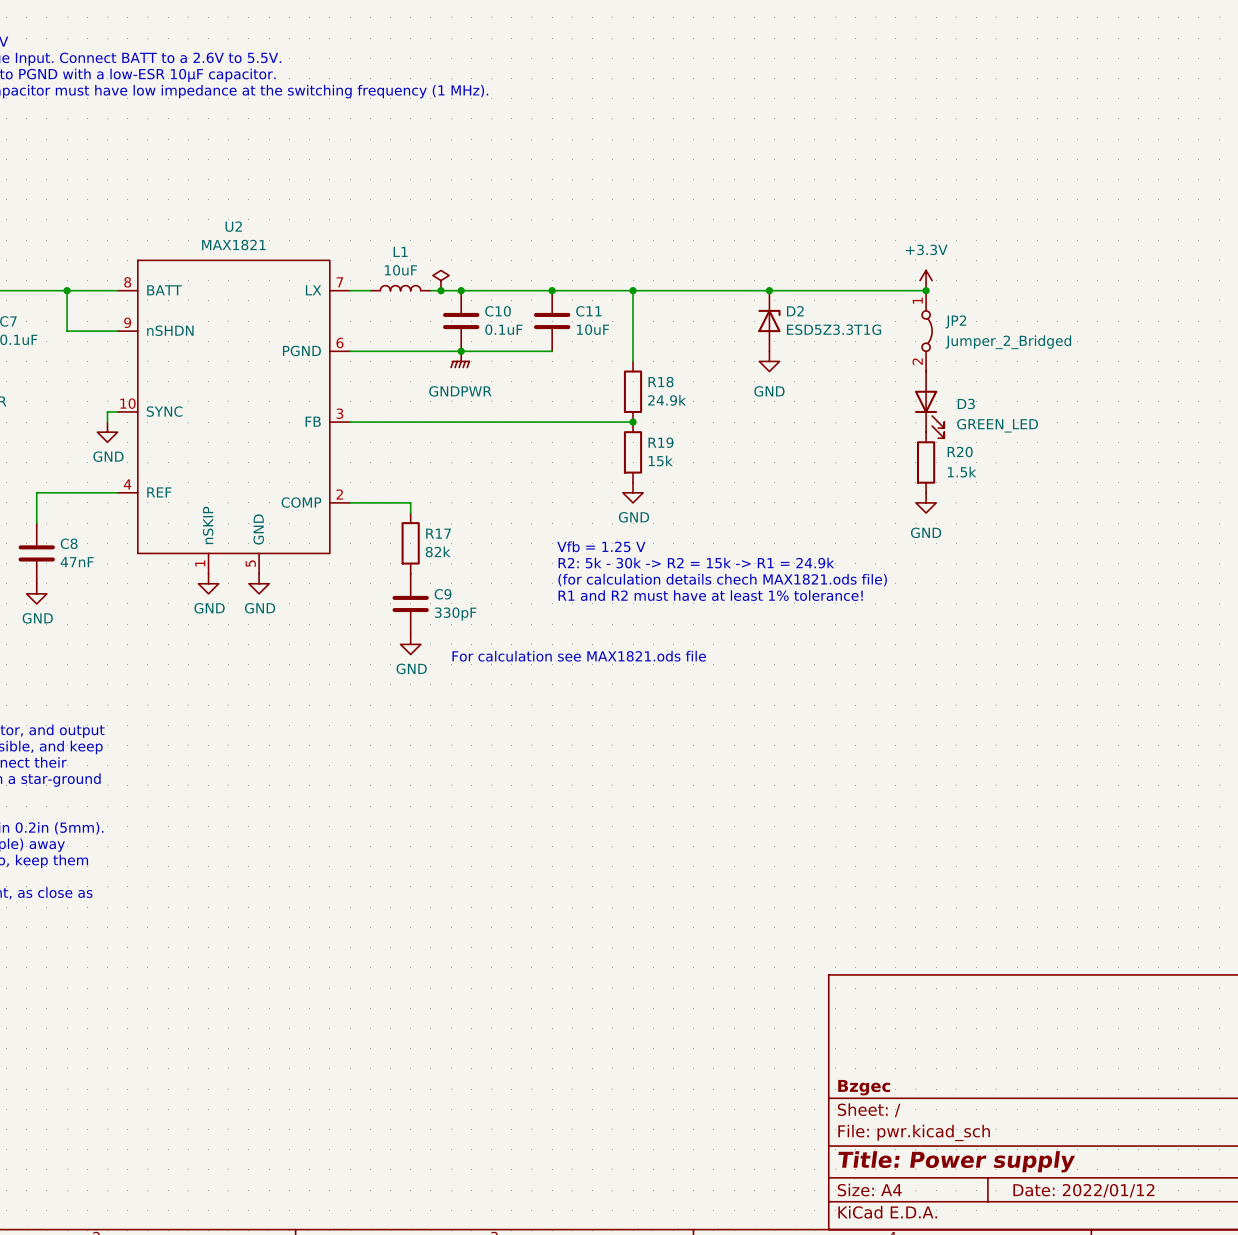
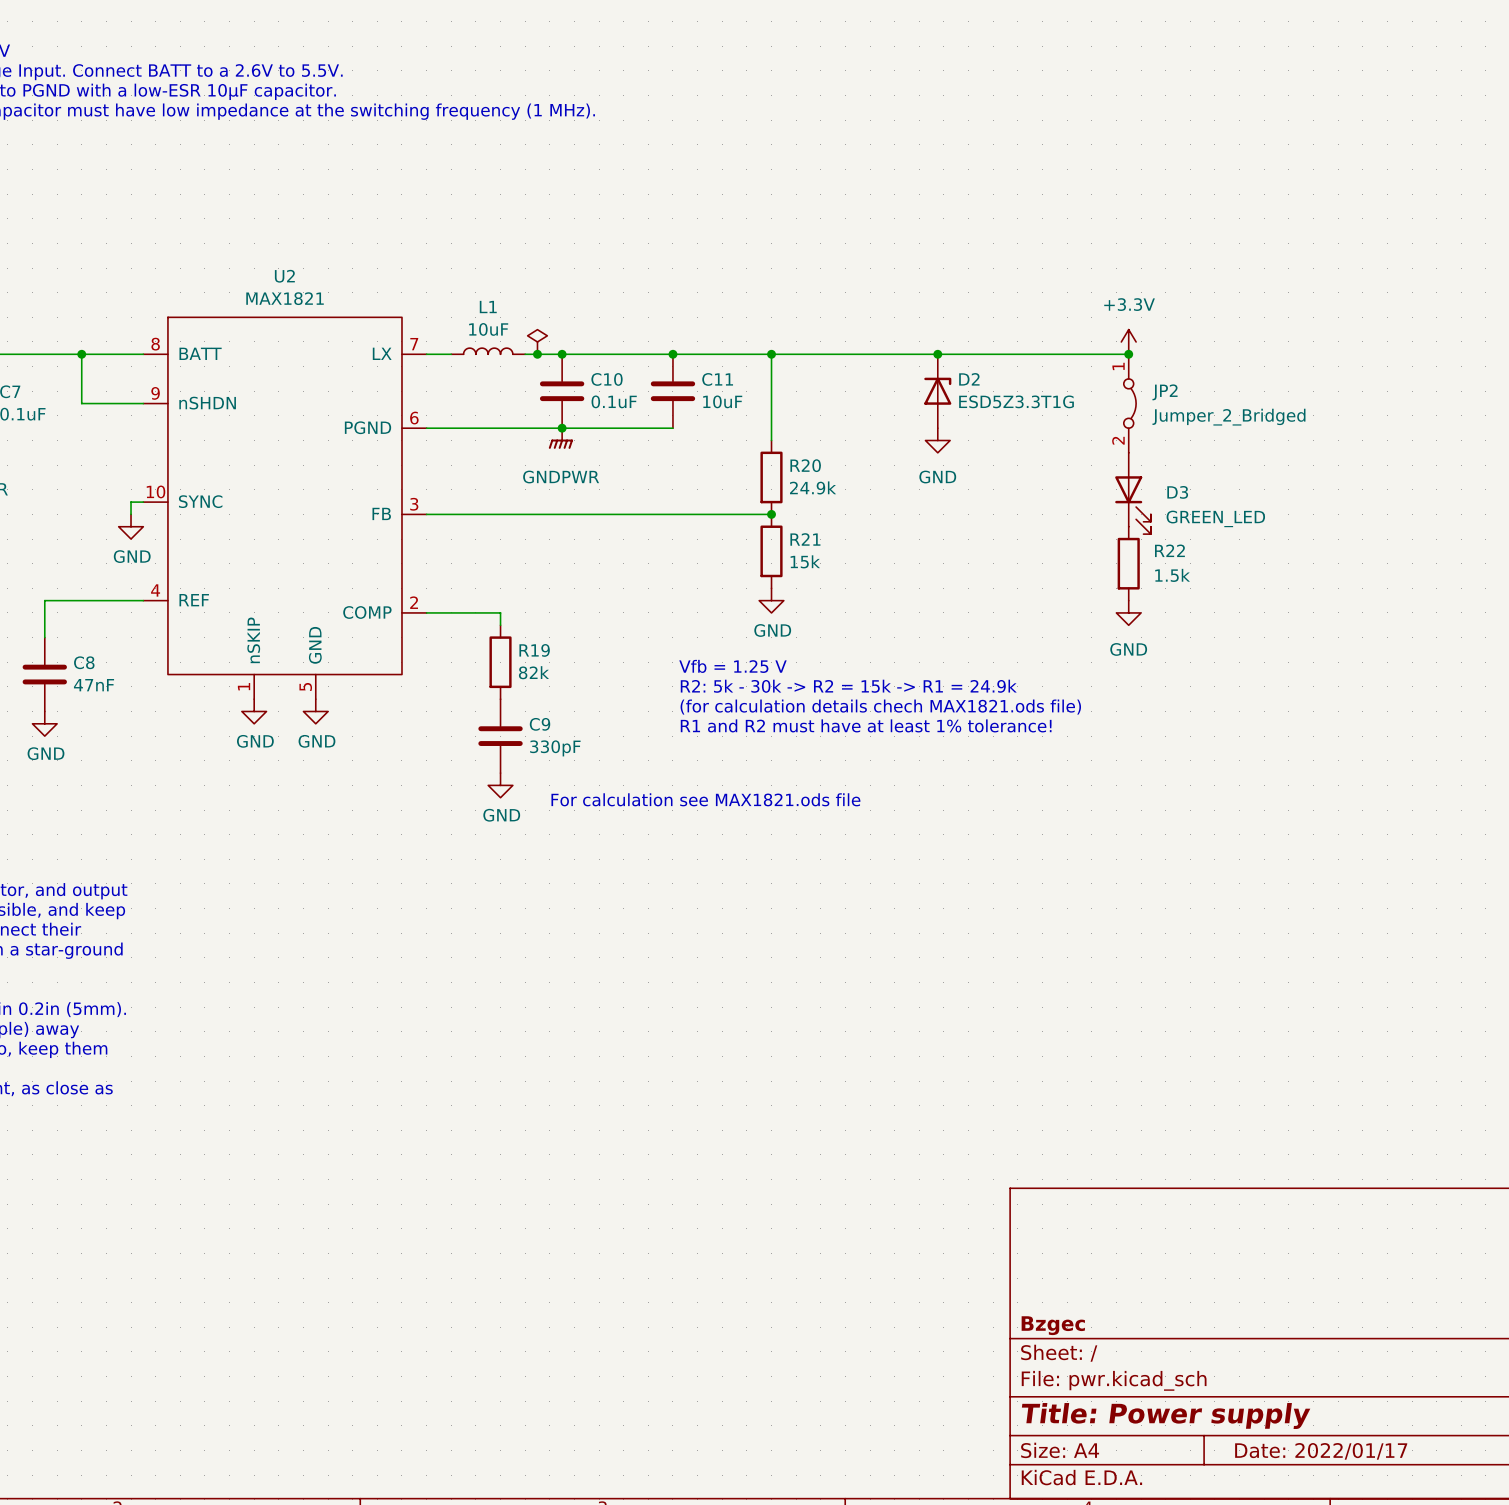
R18 name: R18 (660, 382) -> R20 (805, 465)
R19 name: R19 (660, 442) -> R21 (805, 539)
R20 name: R20 (960, 452) -> R22 (1169, 550)
R17 name: R17 (438, 533) -> R19 (534, 650)
title block: Date: 2022/01/12 (1083, 1190) -> Date: 2022/01/17 (1321, 1451)

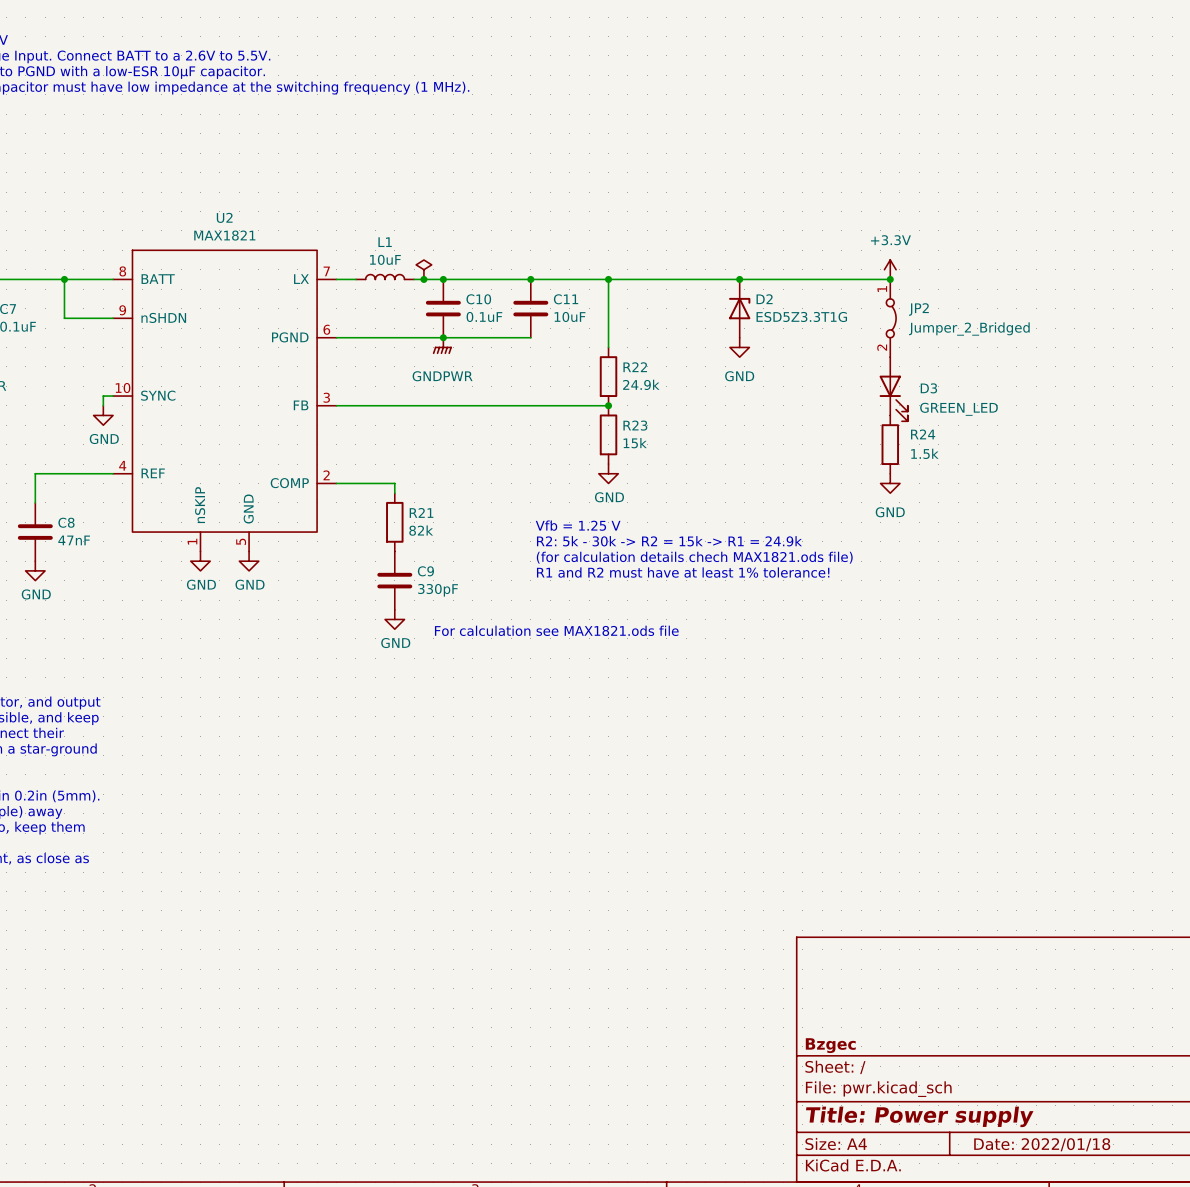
R20 name: R20 (805, 465) -> R22 (635, 367)
R21 name: R21 (805, 539) -> R23 (635, 425)
R22 name: R22 (1169, 550) -> R24 (923, 434)
R19 name: R19 (534, 650) -> R21 (421, 512)
title block: Date: 2022/01/17 (1321, 1451) -> Date: 2022/01/18 (1042, 1144)

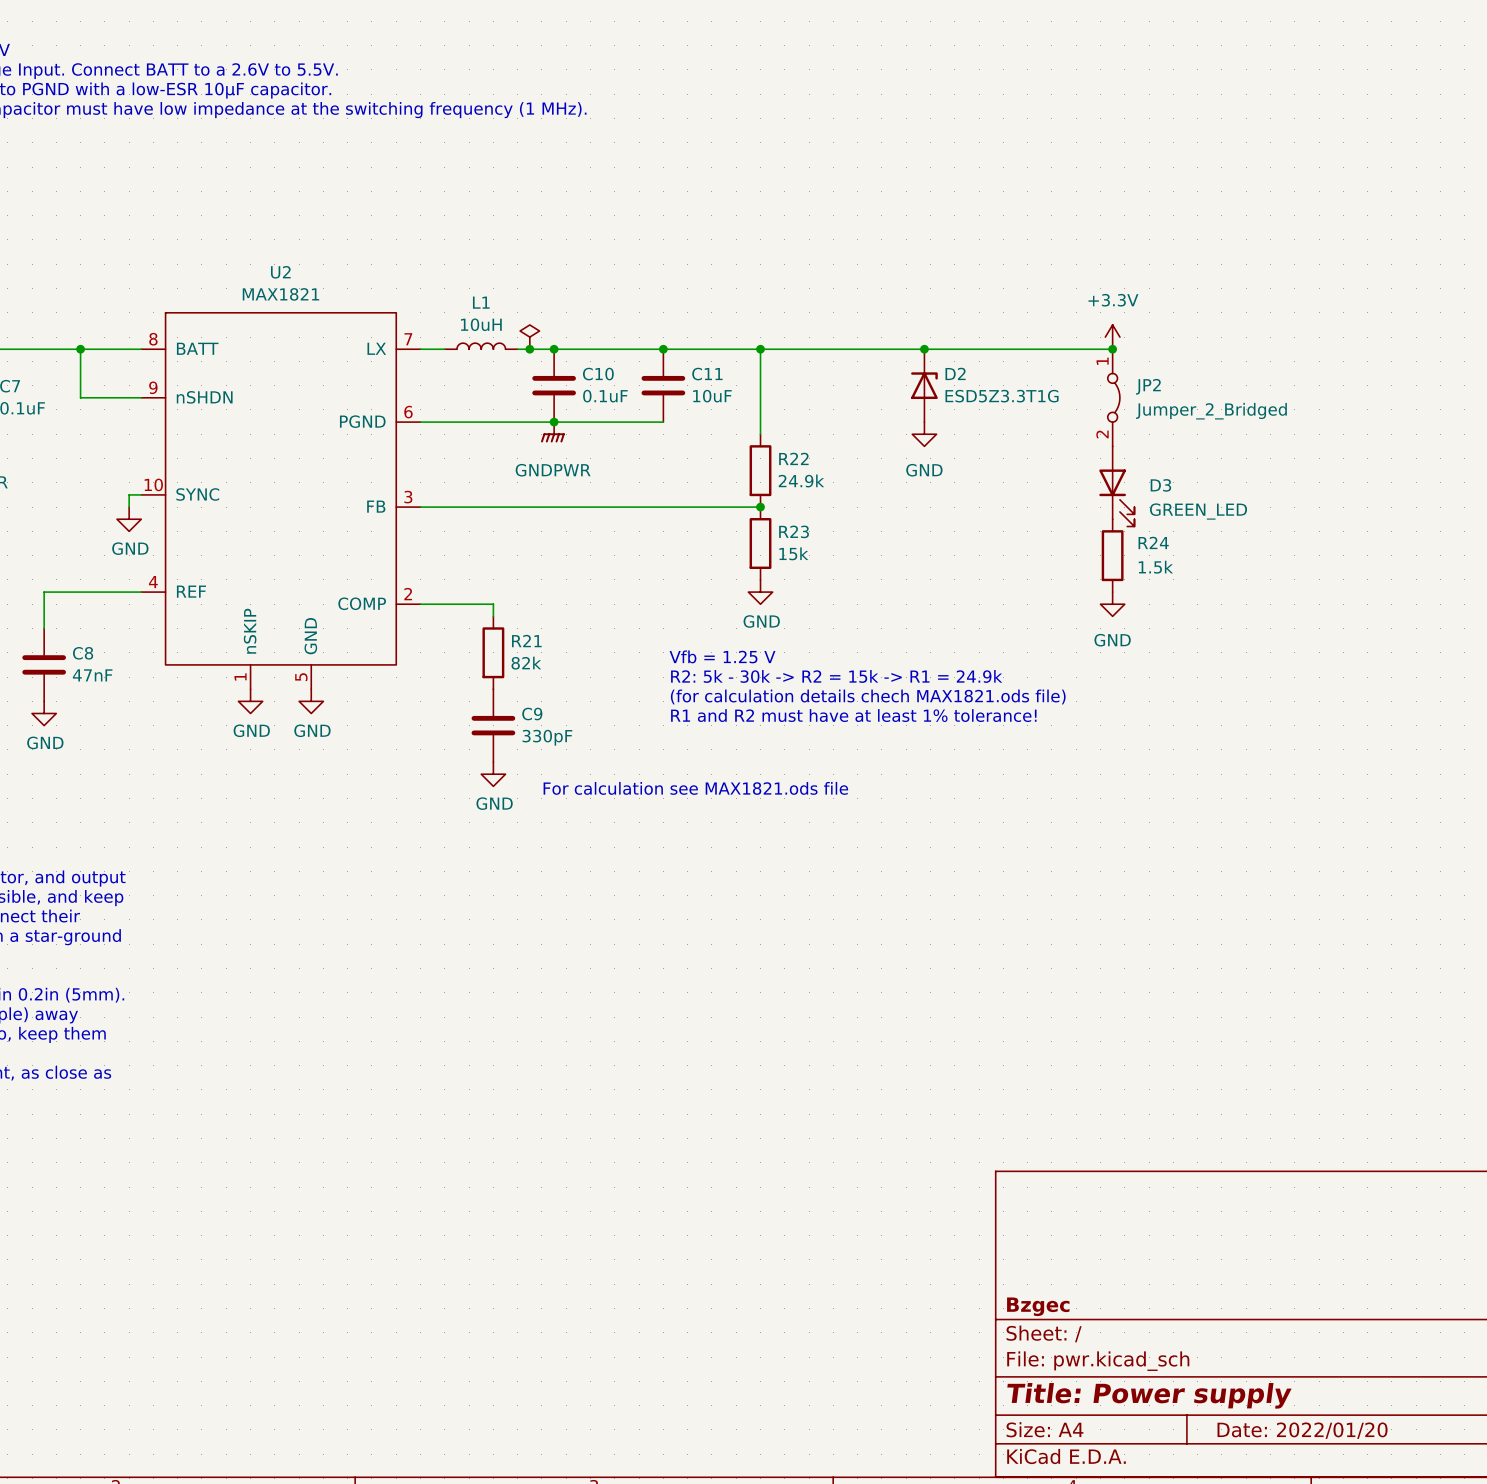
L1 value: 10uF (385, 259) -> 10uH (481, 324)
title block: Date: 2022/01/18 (1042, 1144) -> Date: 2022/01/20 (1302, 1430)

